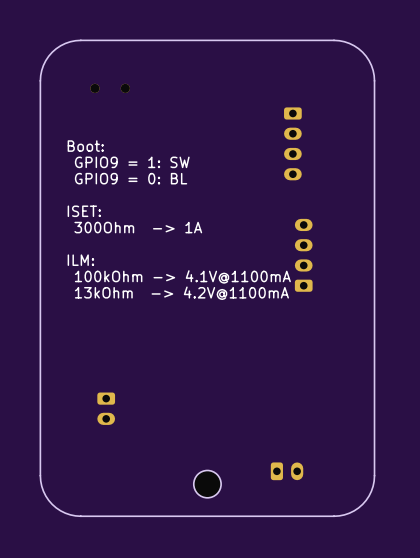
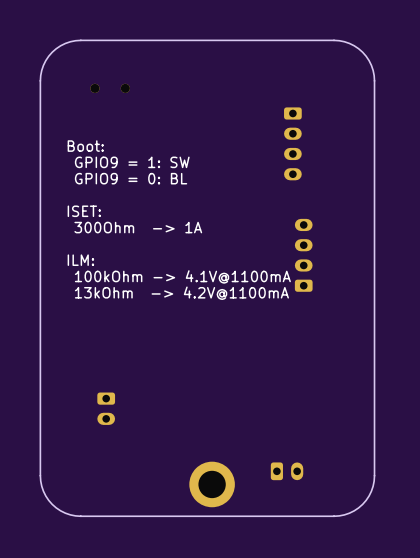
part footprint: [193, 470, 222, 498] -> [189, 461, 235, 508]

